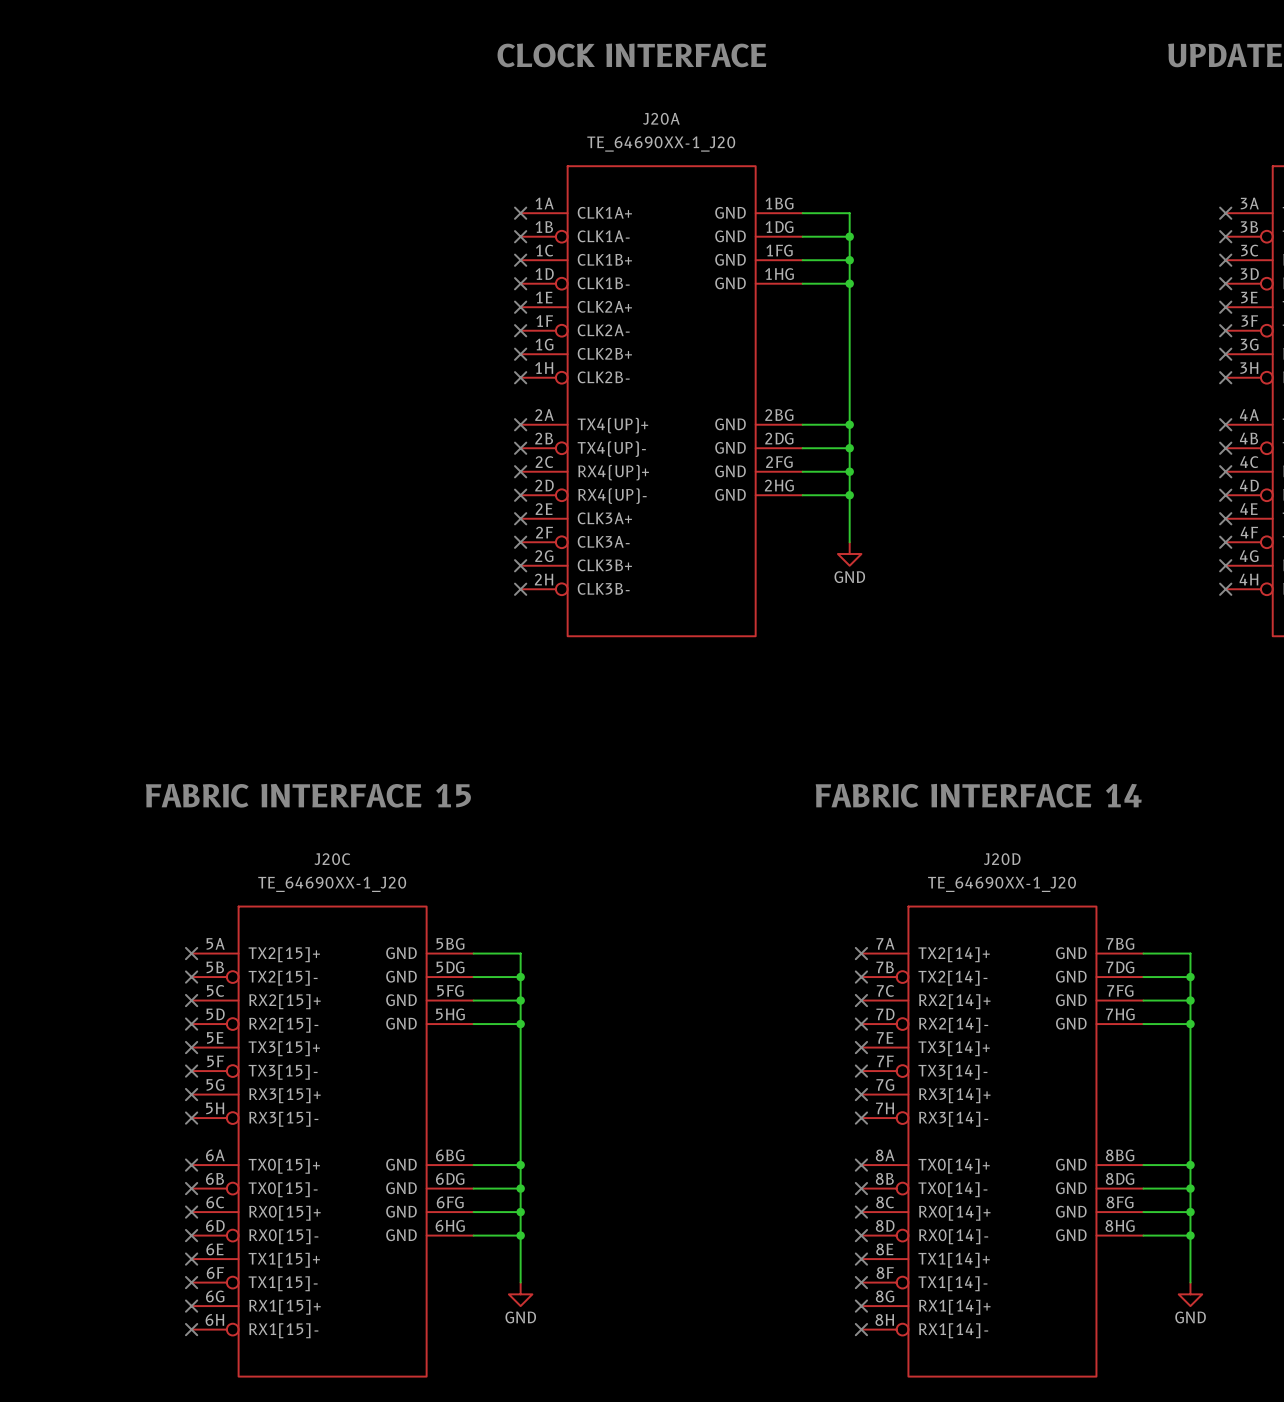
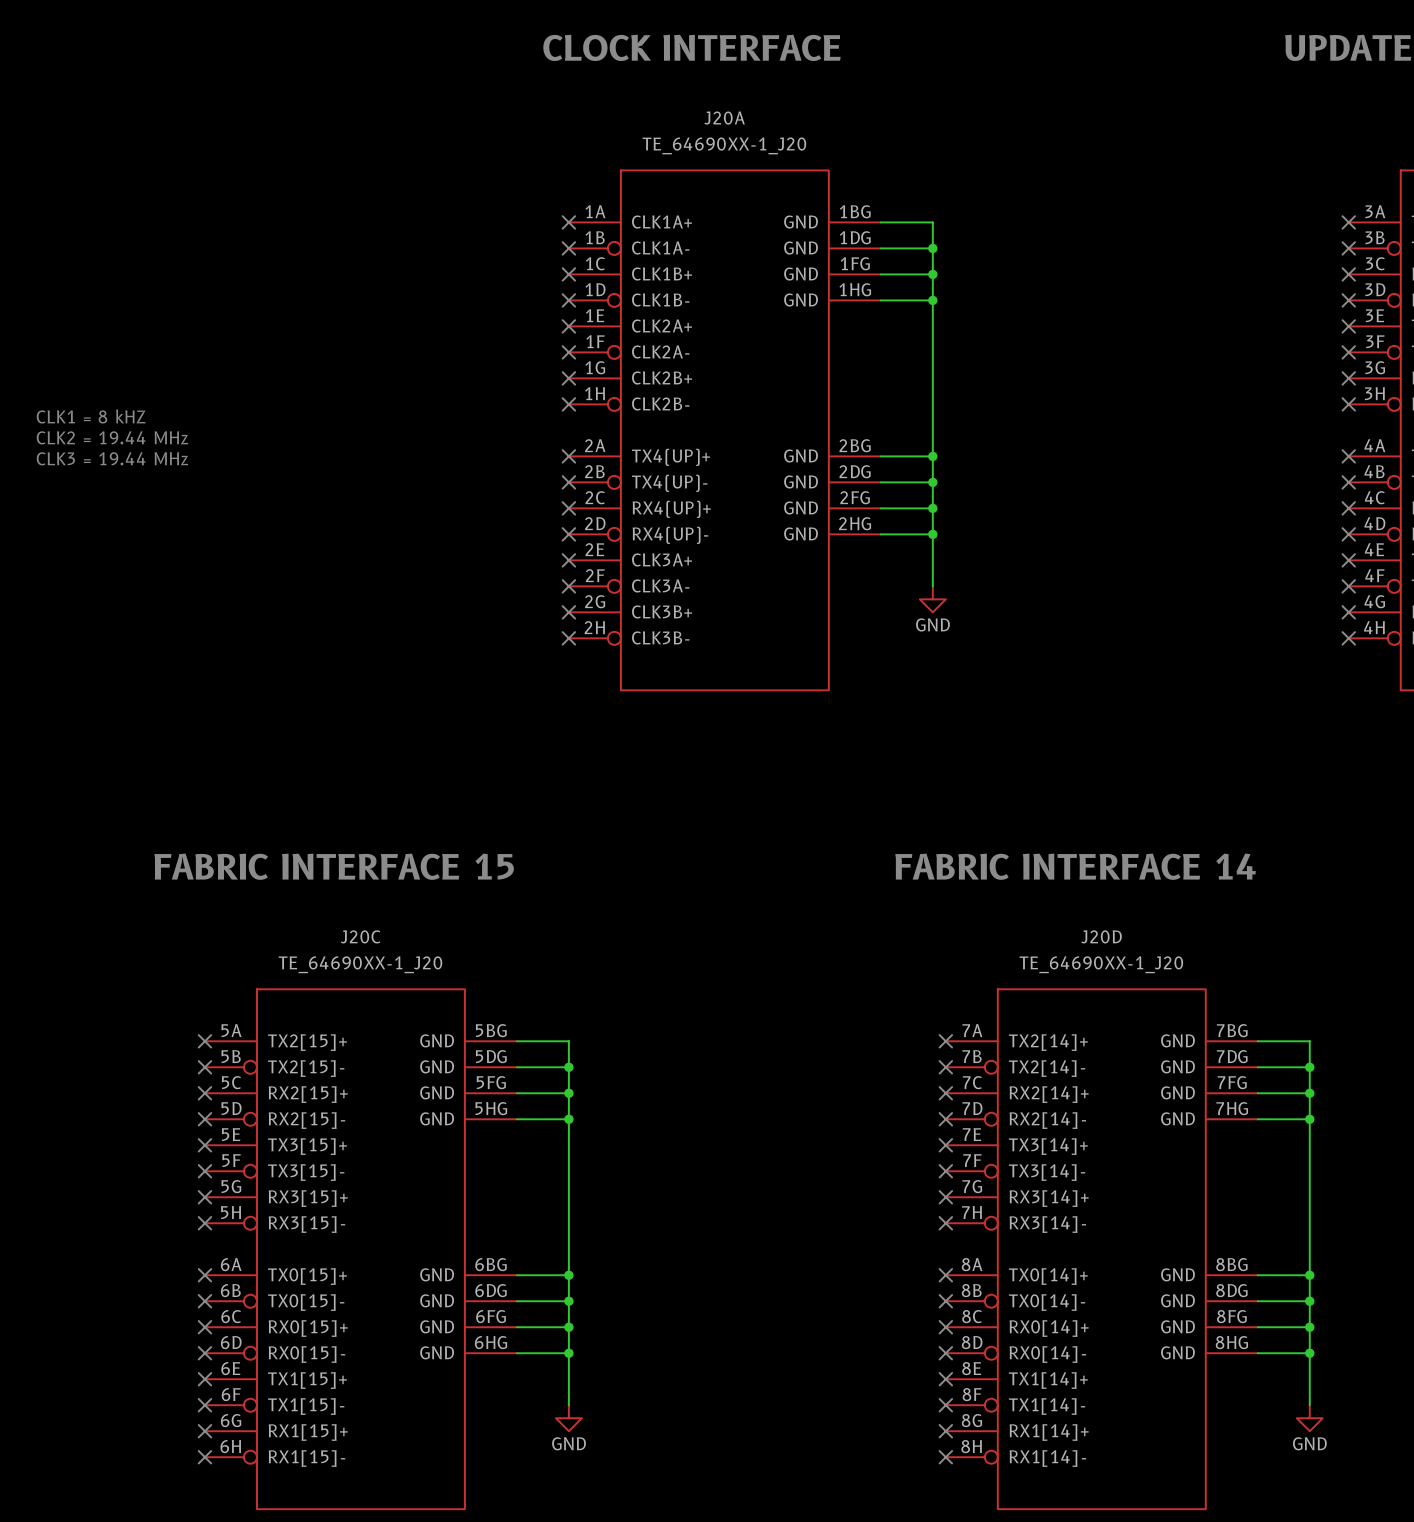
text: none -> CLK1 = 8 kHZ (91, 416)
text: none -> CLK2 = 19.44 MHz (112, 437)
text: none -> CLK3 = 19.44 MHz (112, 458)

